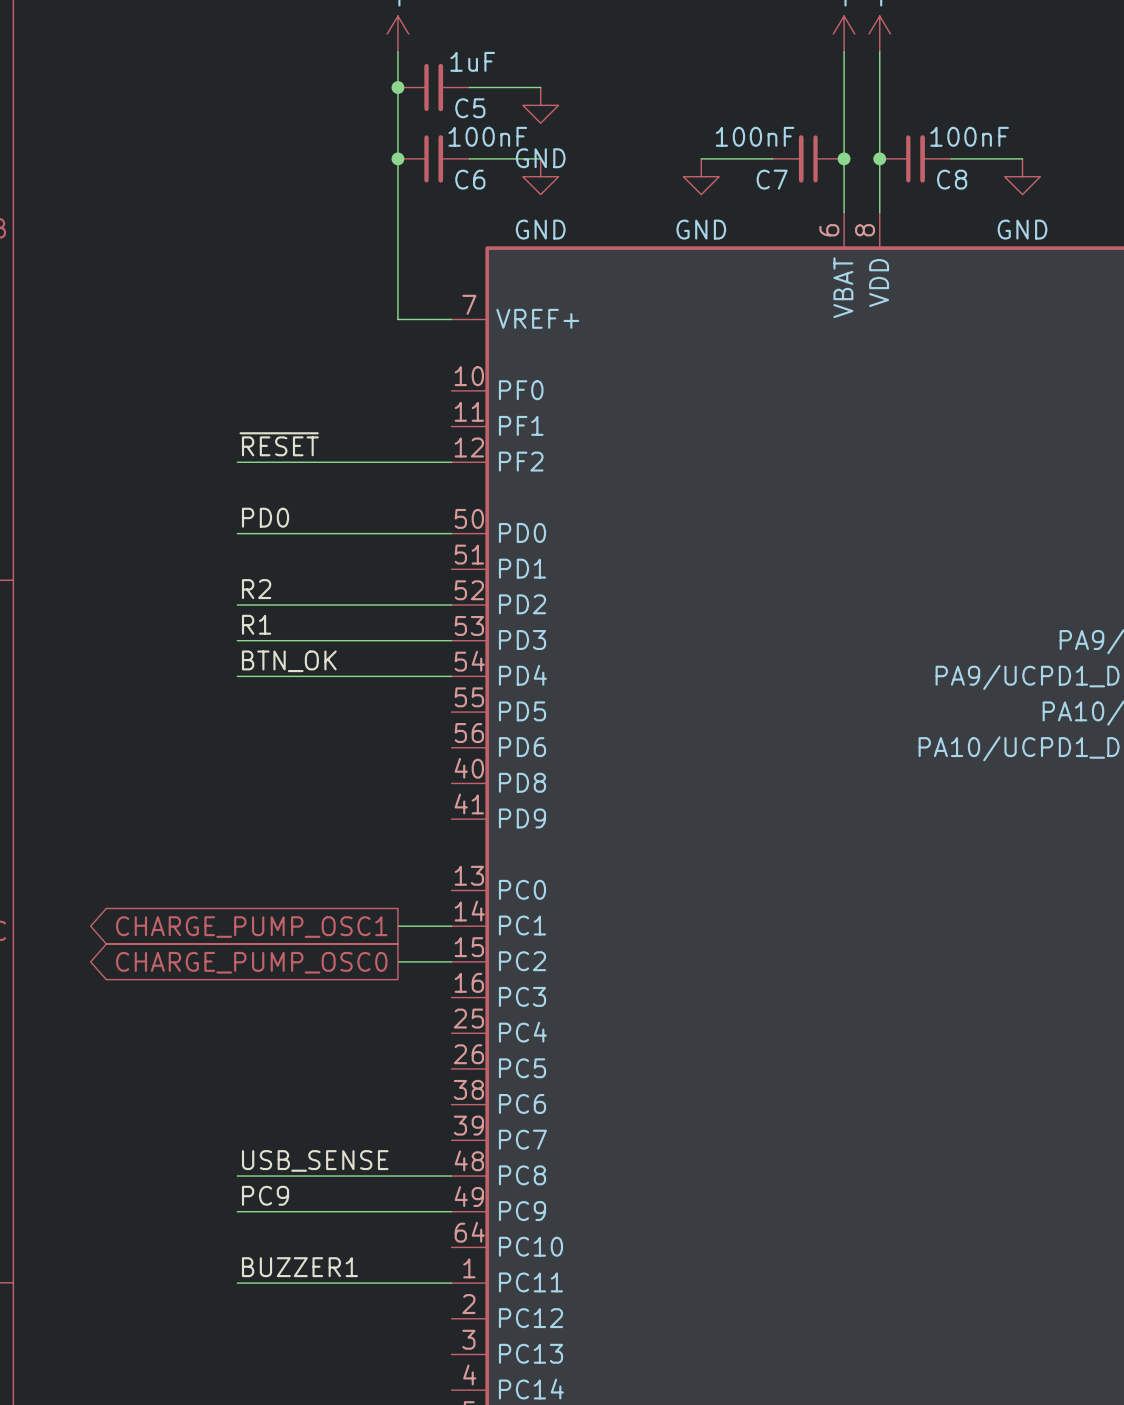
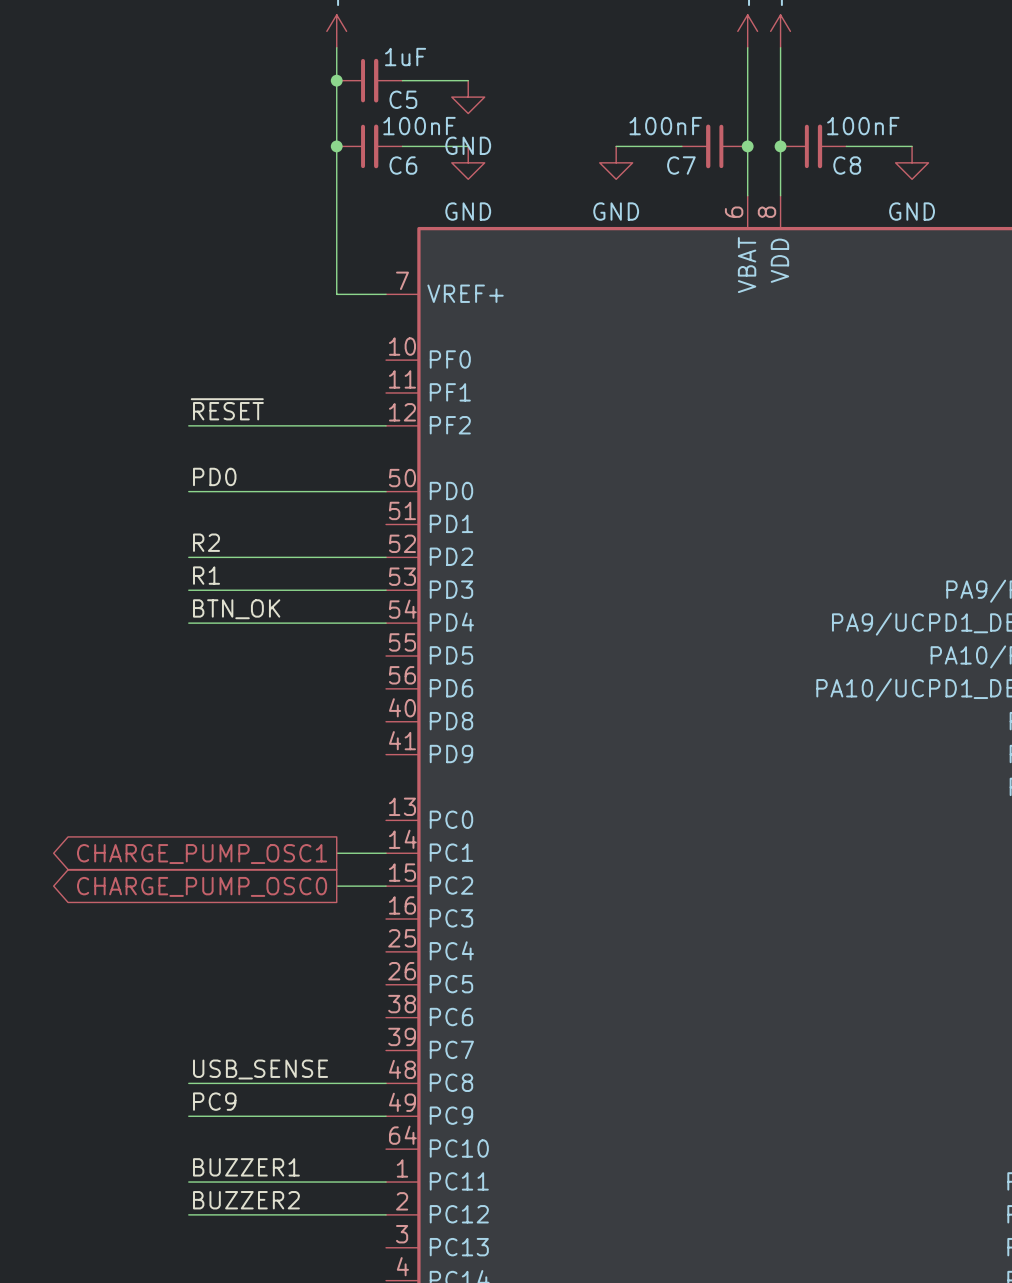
label: none -> BUZZER2 (246, 1200)
wire: none -> (188, 1214) (386, 1214)

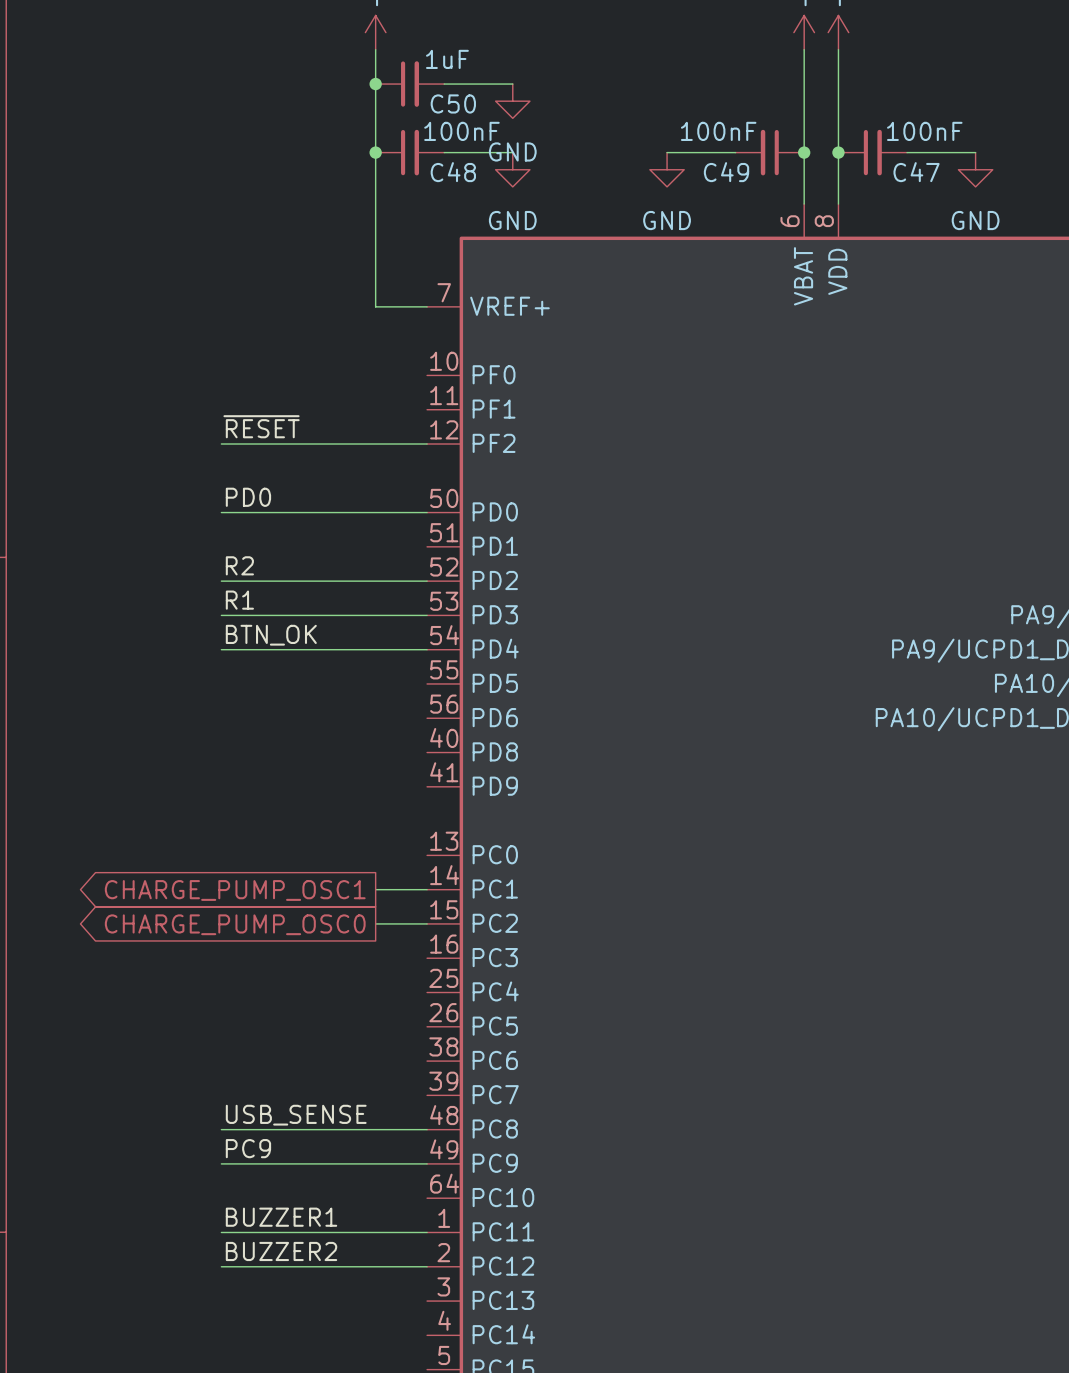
C5 name: C5 (403, 99) -> C50 (453, 103)
C6 name: C6 (403, 165) -> C48 (453, 172)
C7 name: C7 (681, 165) -> C49 (726, 172)
C8 name: C8 (847, 165) -> C47 (916, 172)

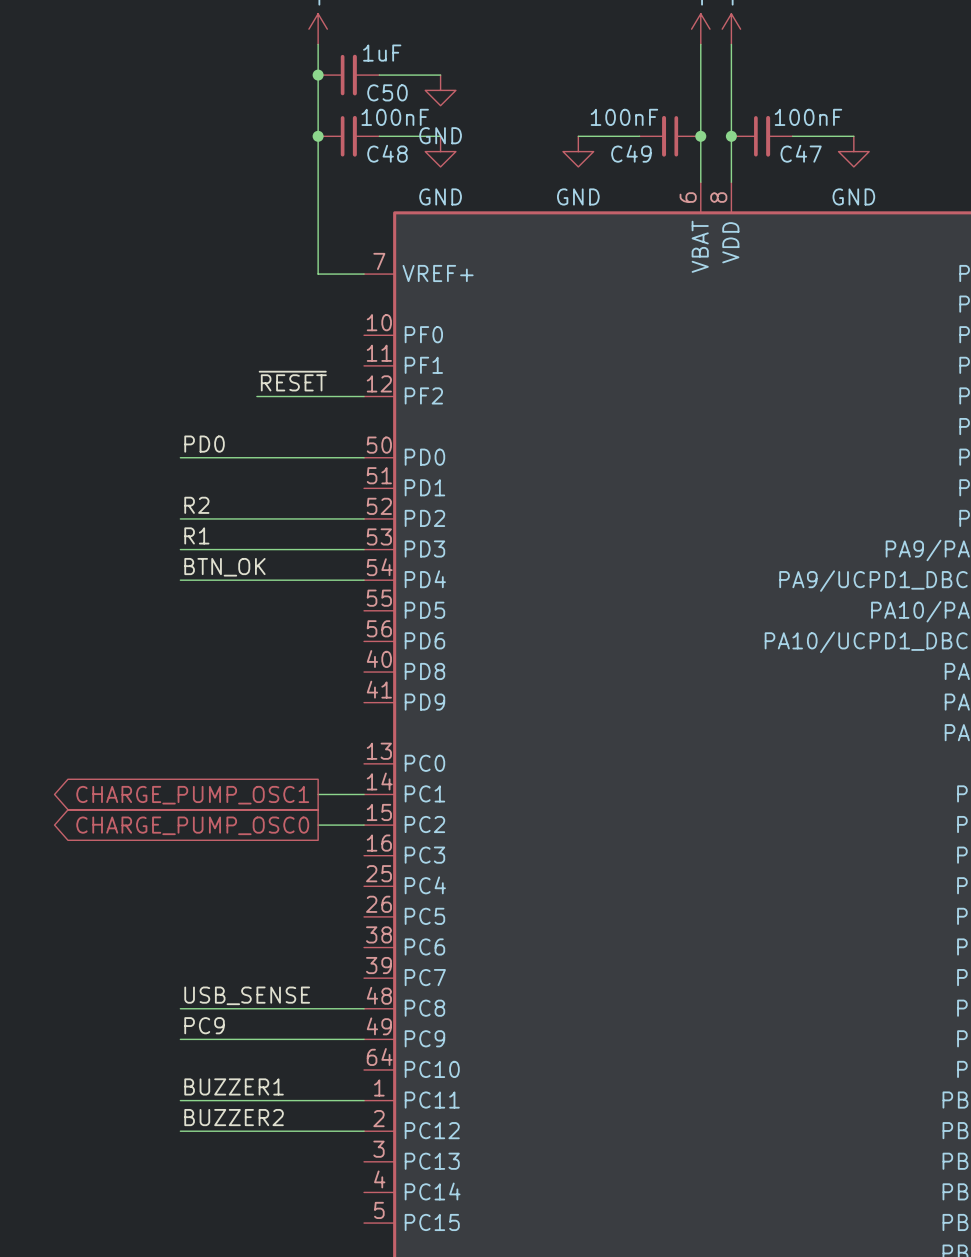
label position: ~{RESET} (261, 426) -> ~{RESET} (292, 381)
wire: (221, 444) (307, 444) -> none

